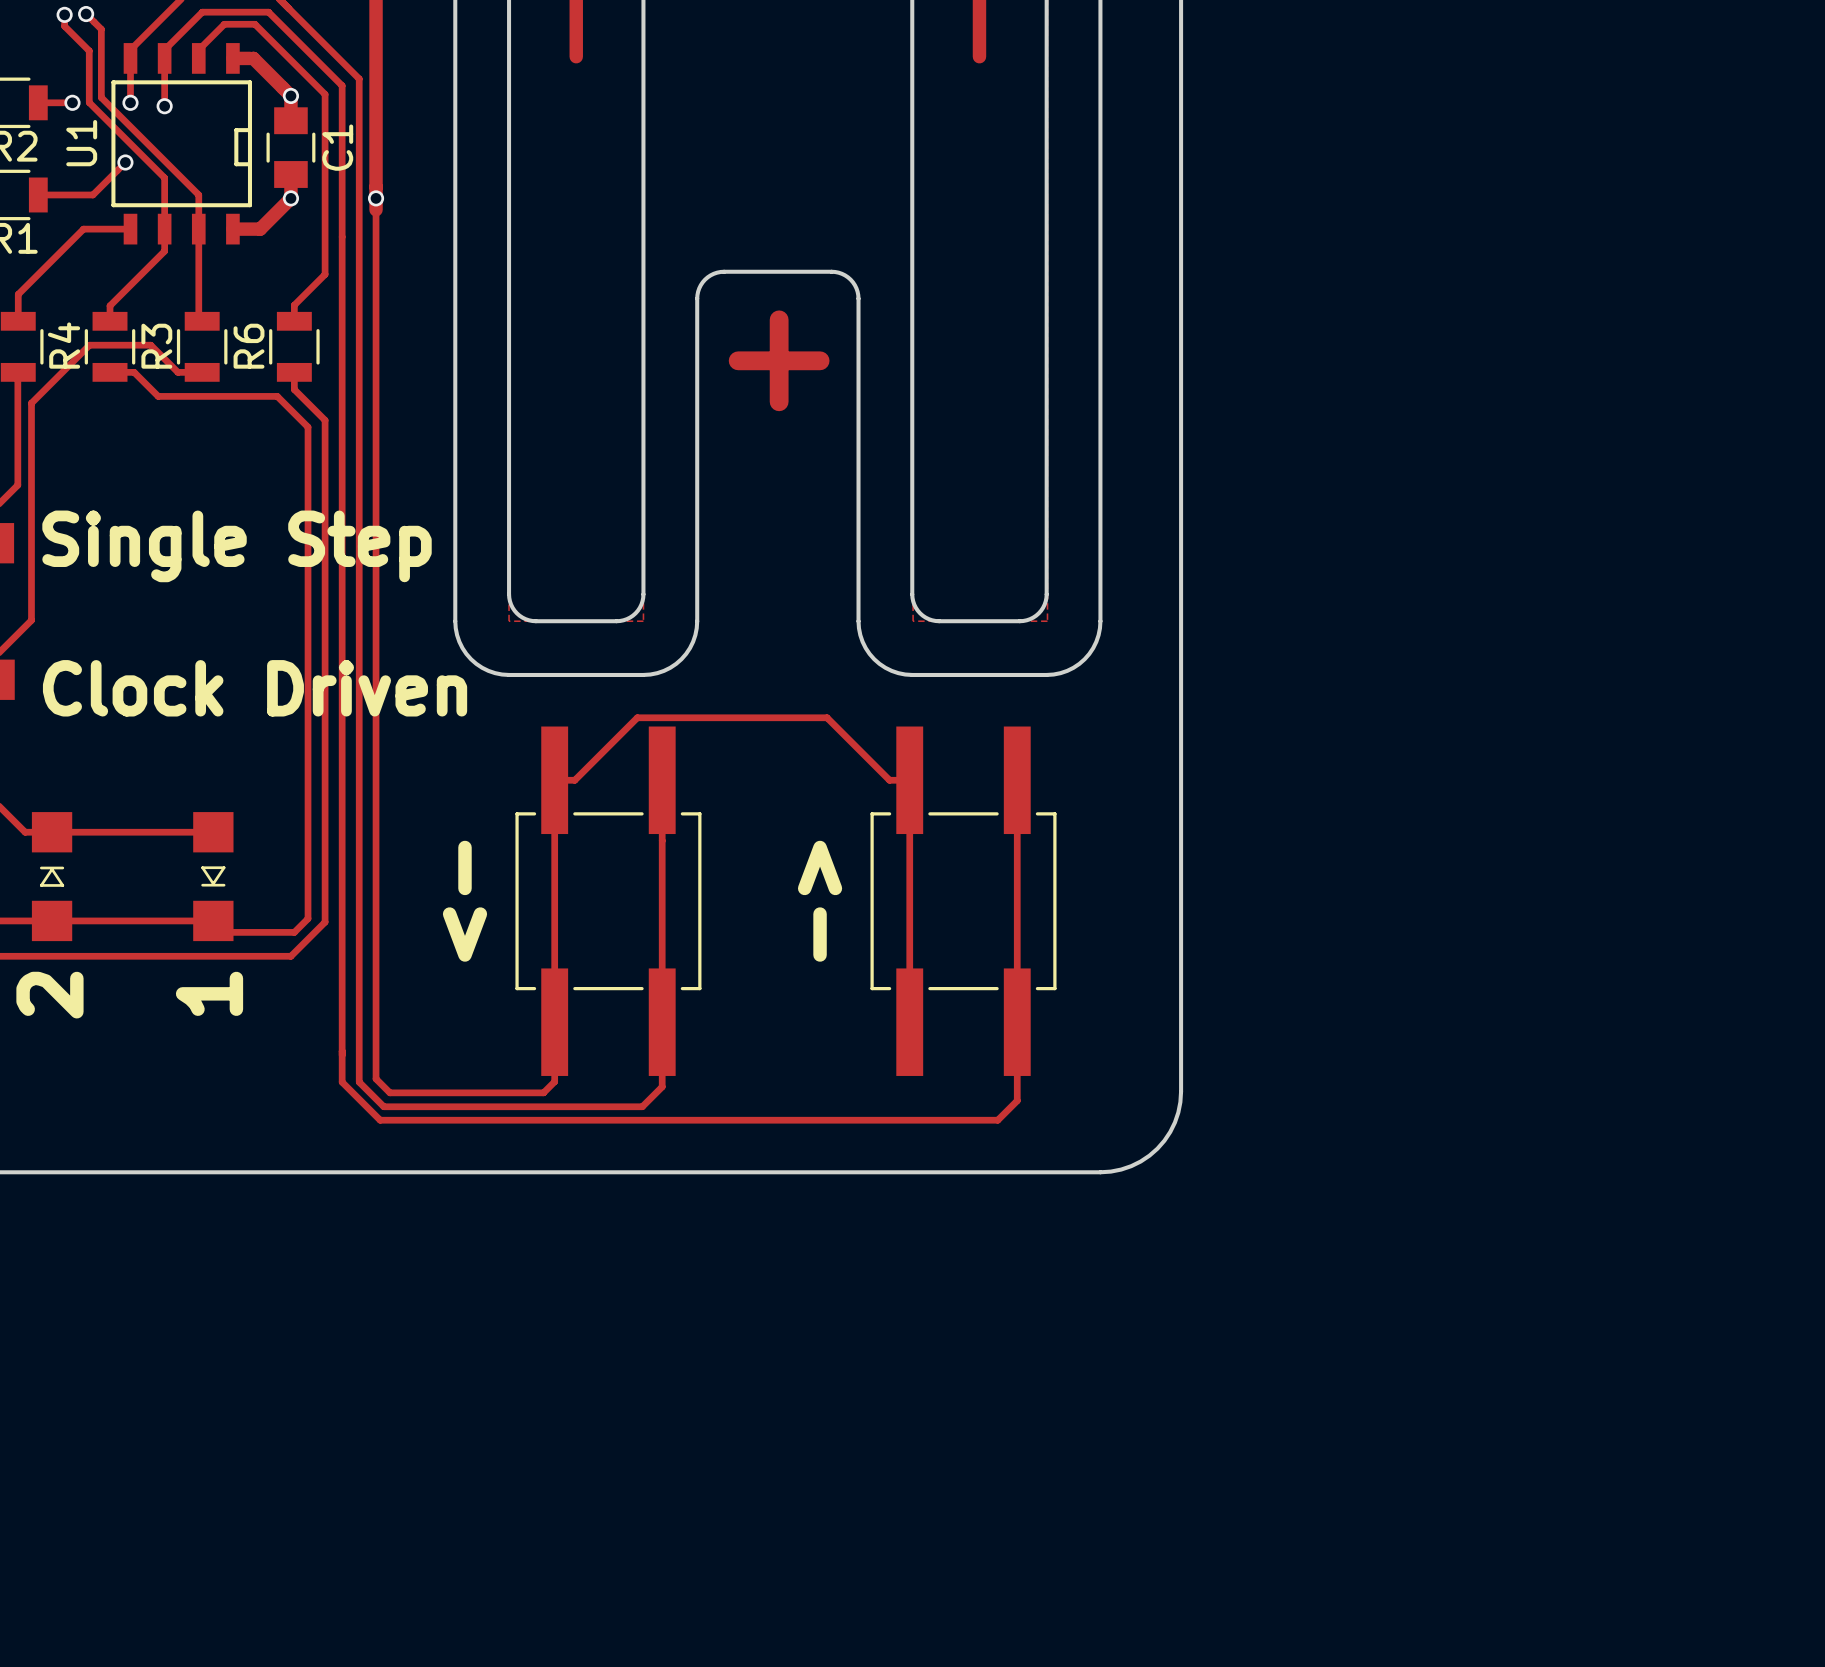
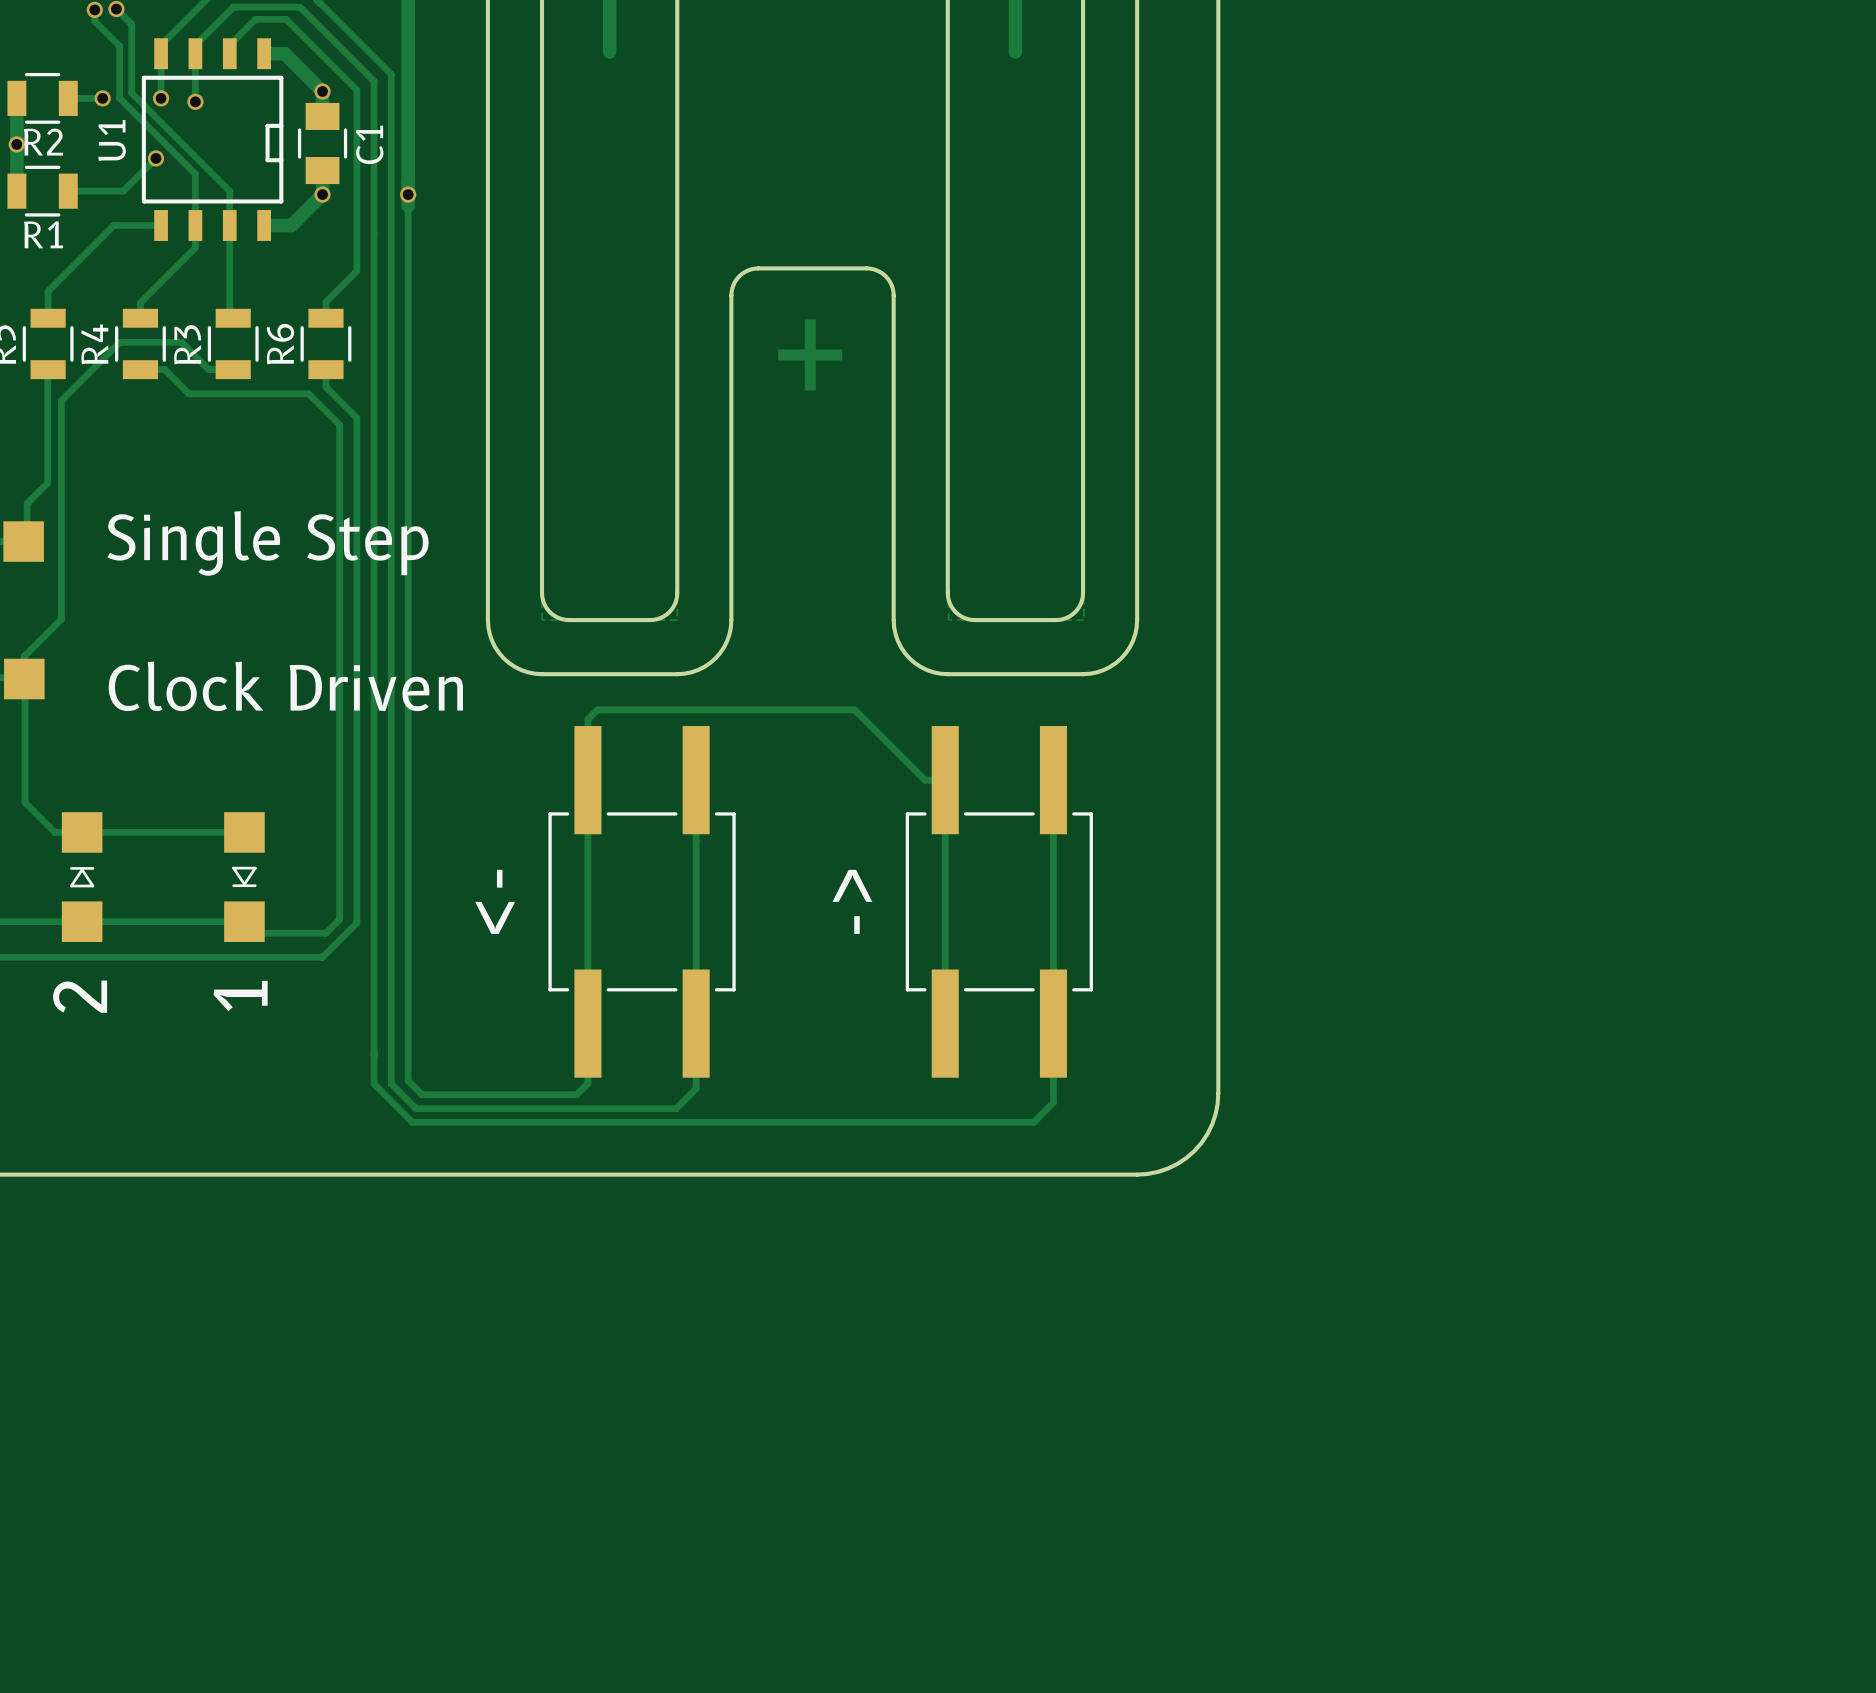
track: (827, 717) (637, 717) (574, 780) (554, 780) -> (862, 717) (854, 709) (597, 709) (587, 719) (587, 780)

